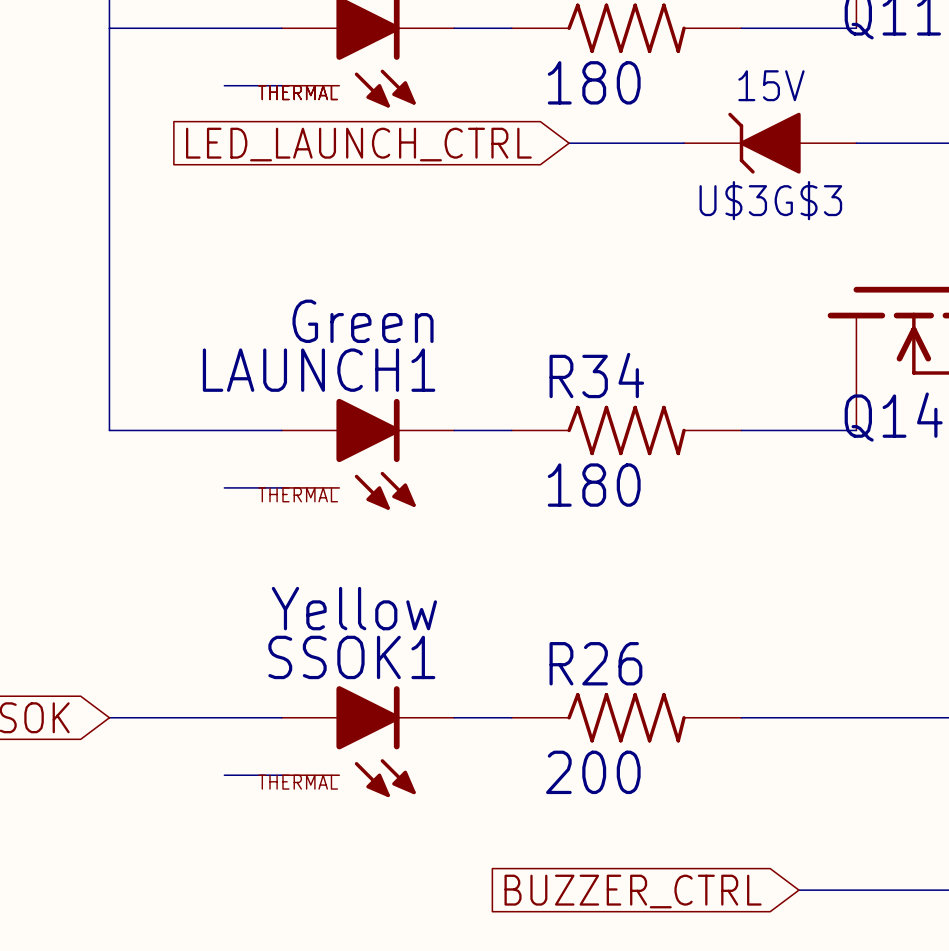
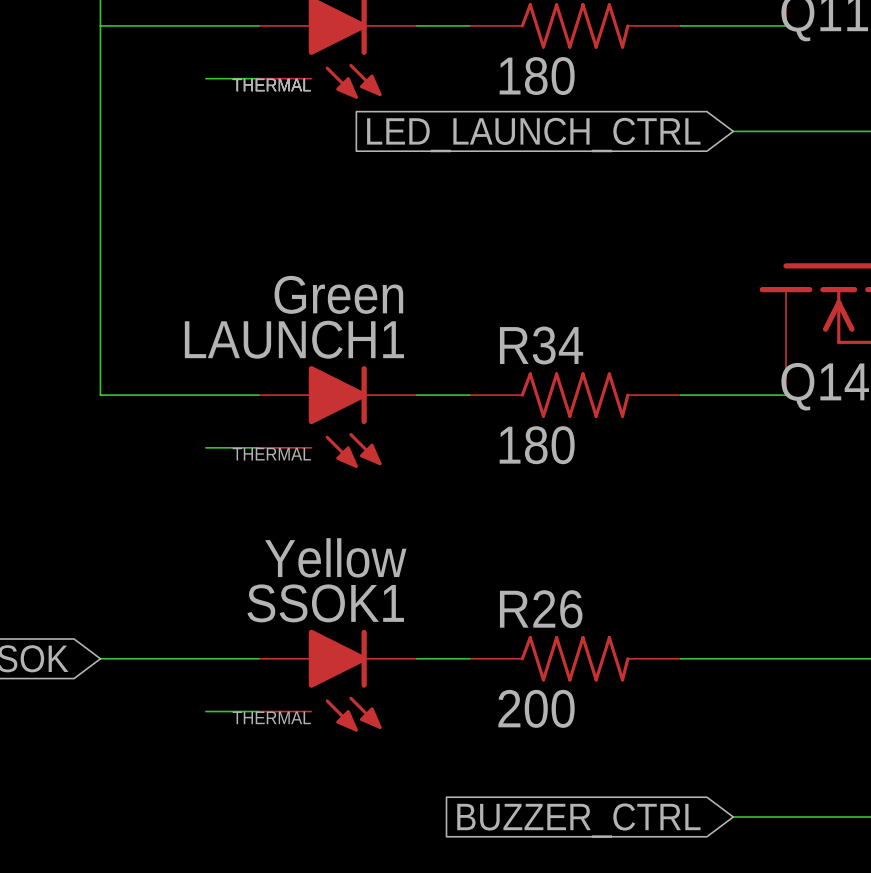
wire: (569, 143) (684, 143) -> none
U$3G$3: (770, 143) -> none
global label position: LED_LAUNCH_CTRL (358, 144) -> LED_LAUNCH_CTRL (533, 135)

